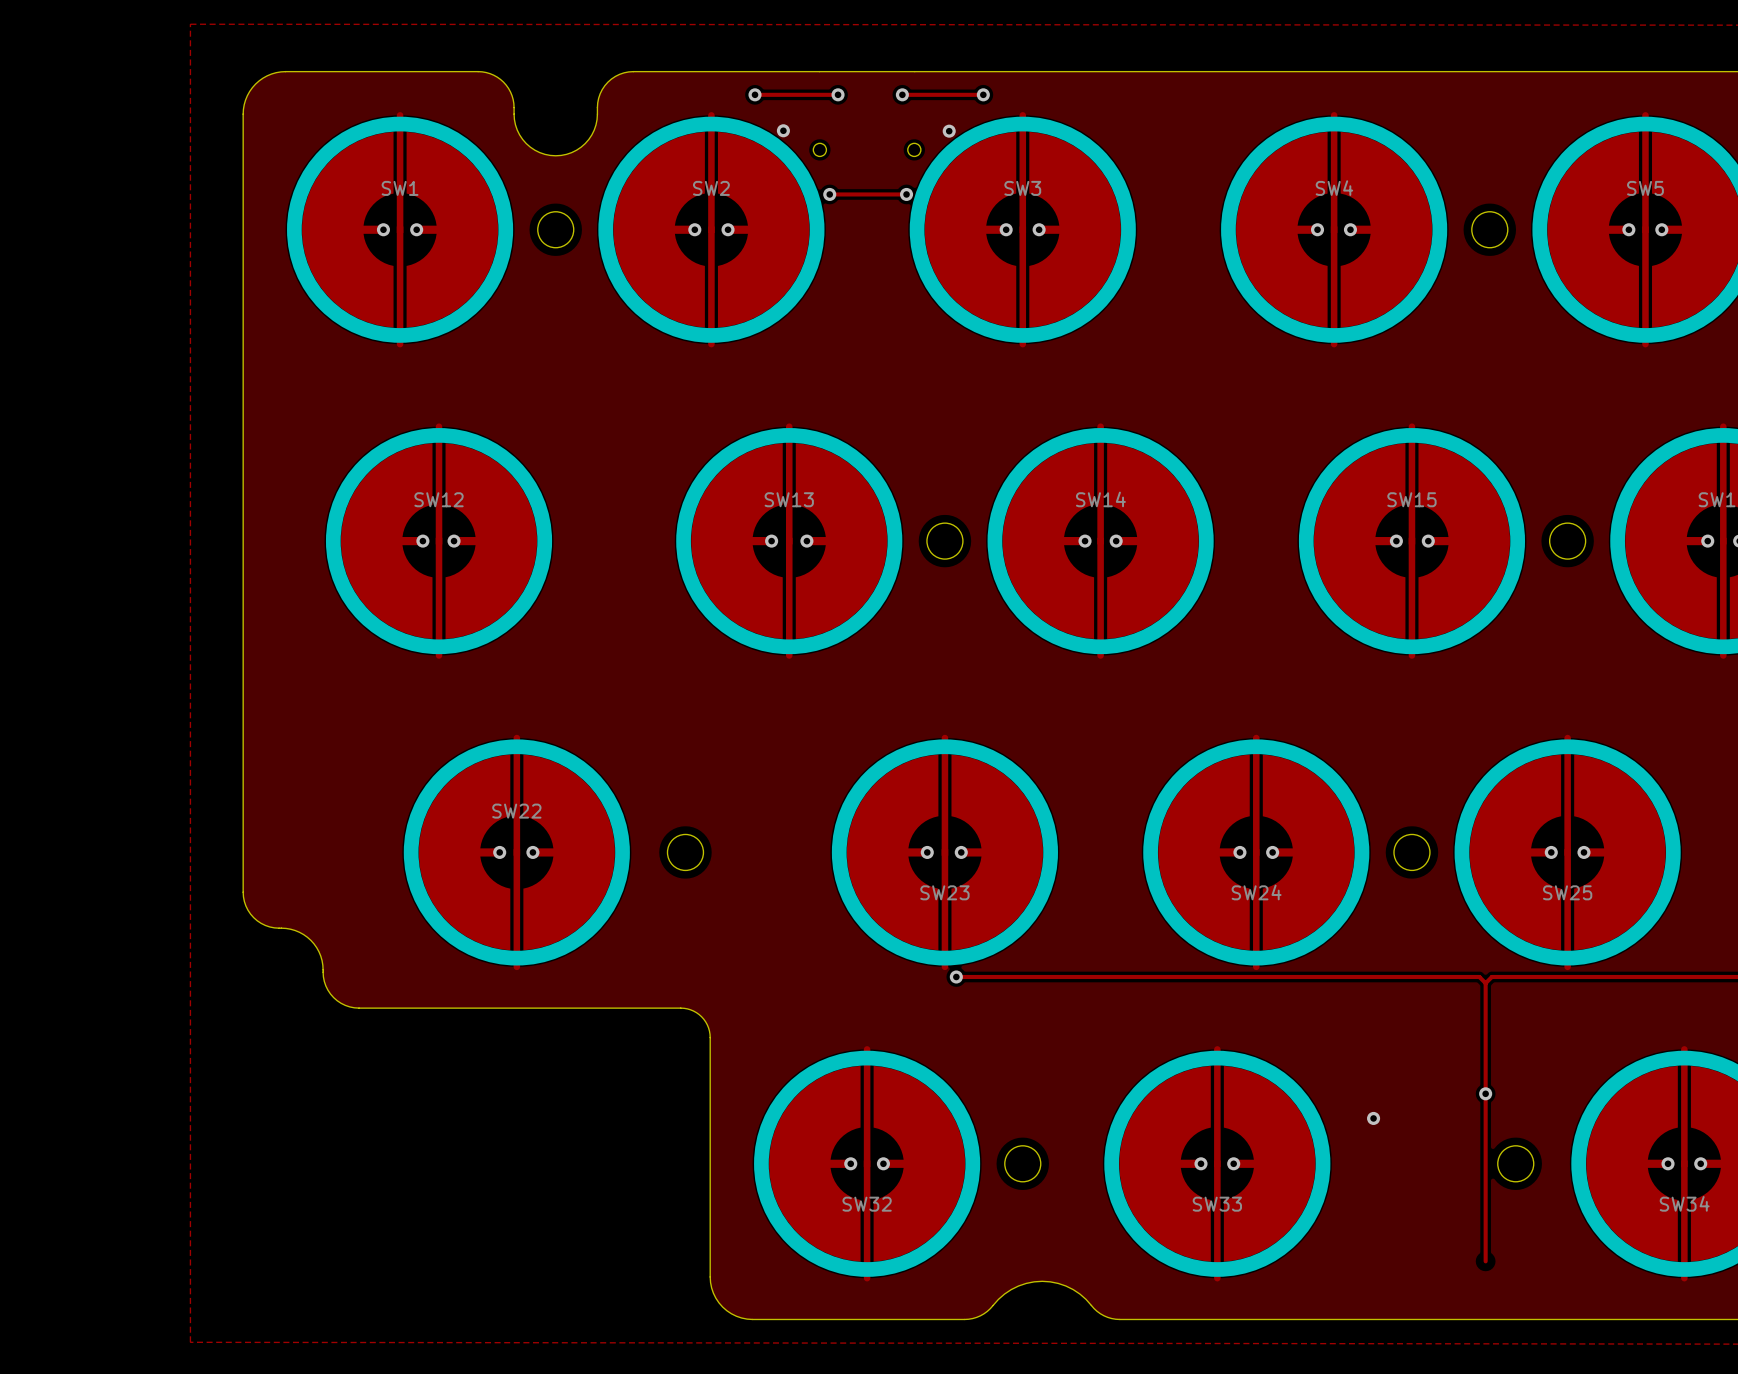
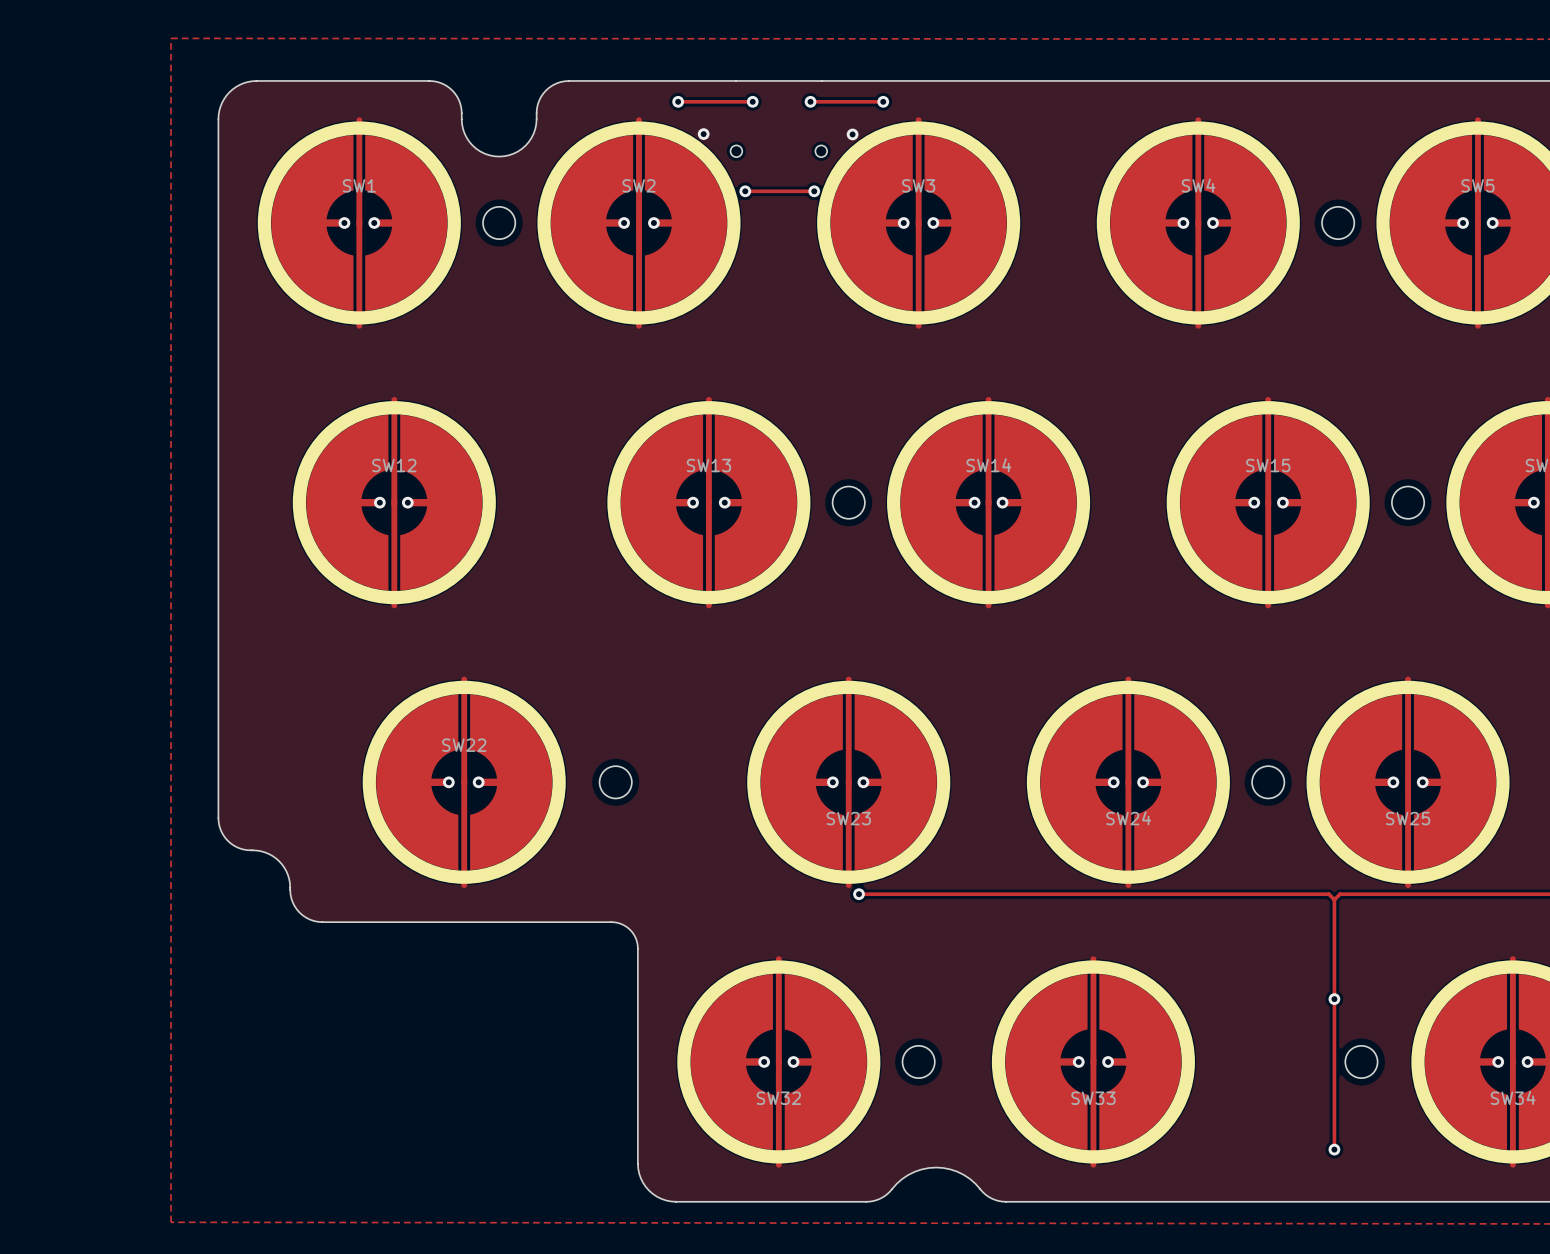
via: (1373, 1118) -> none
via: none -> (1334, 1149)

